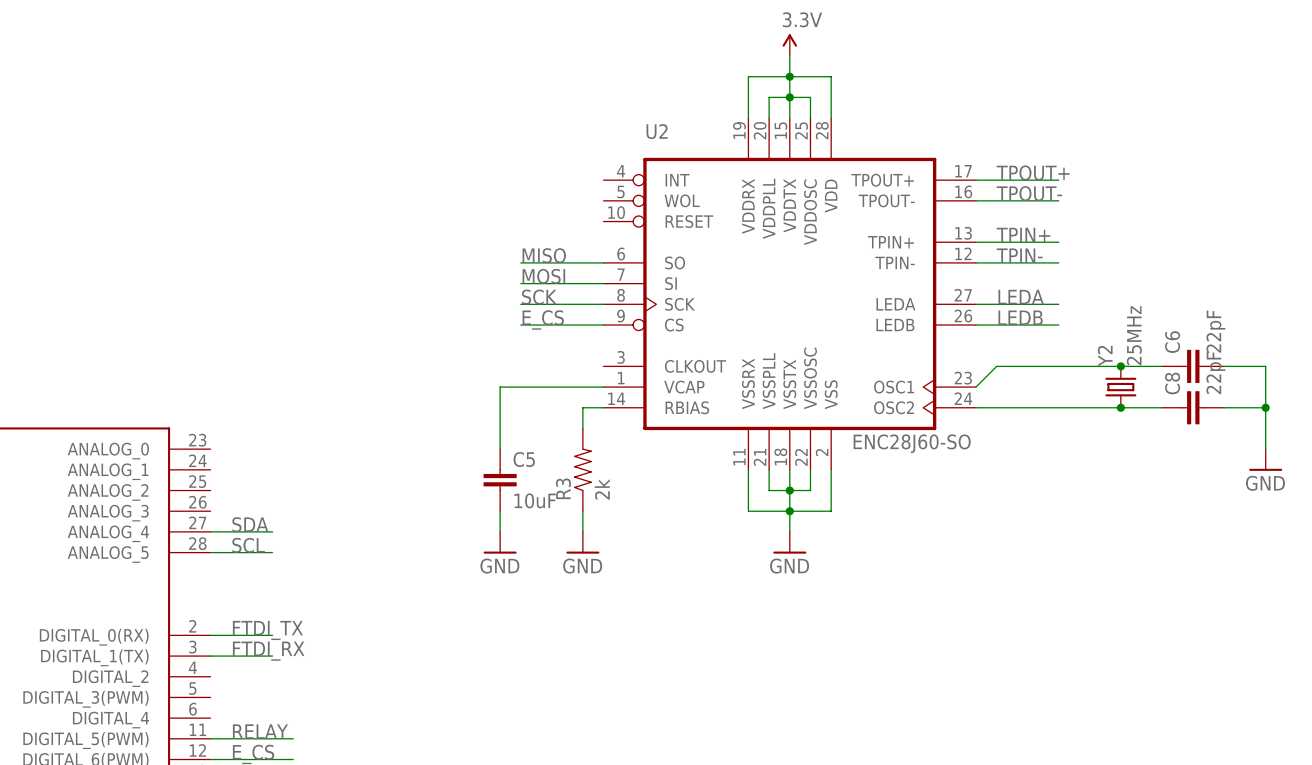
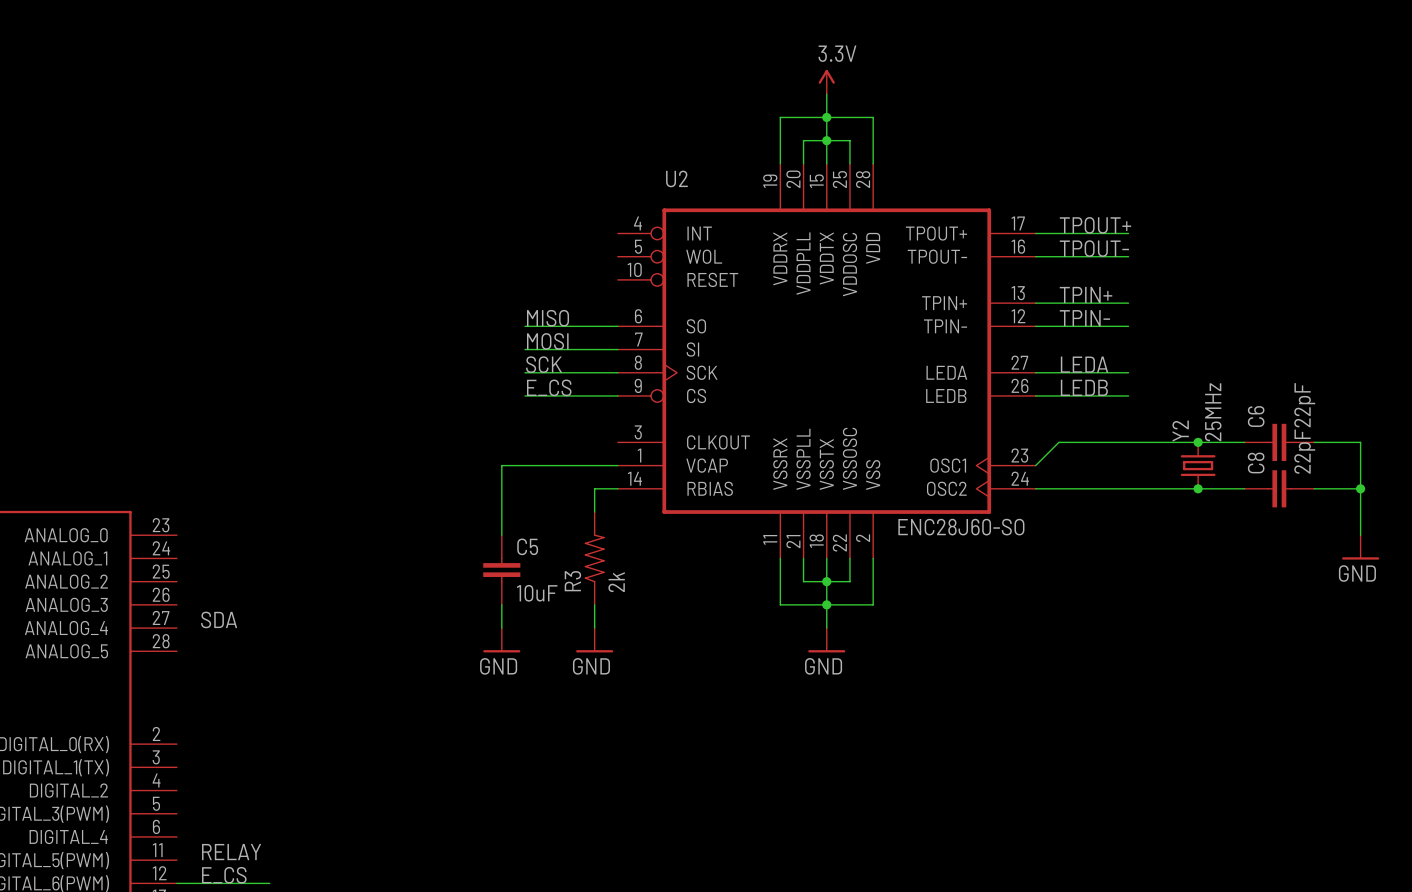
wire: (210, 531) (272, 531) -> none
label: SCL (248, 545) -> none
wire: (210, 552) (272, 552) -> none
label: FTDI_TX (267, 630) -> none
wire: (210, 635) (272, 635) -> none
label: FTDI_RX (268, 651) -> none
wire: (210, 656) (272, 656) -> none
wire: (210, 738) (293, 738) -> none

